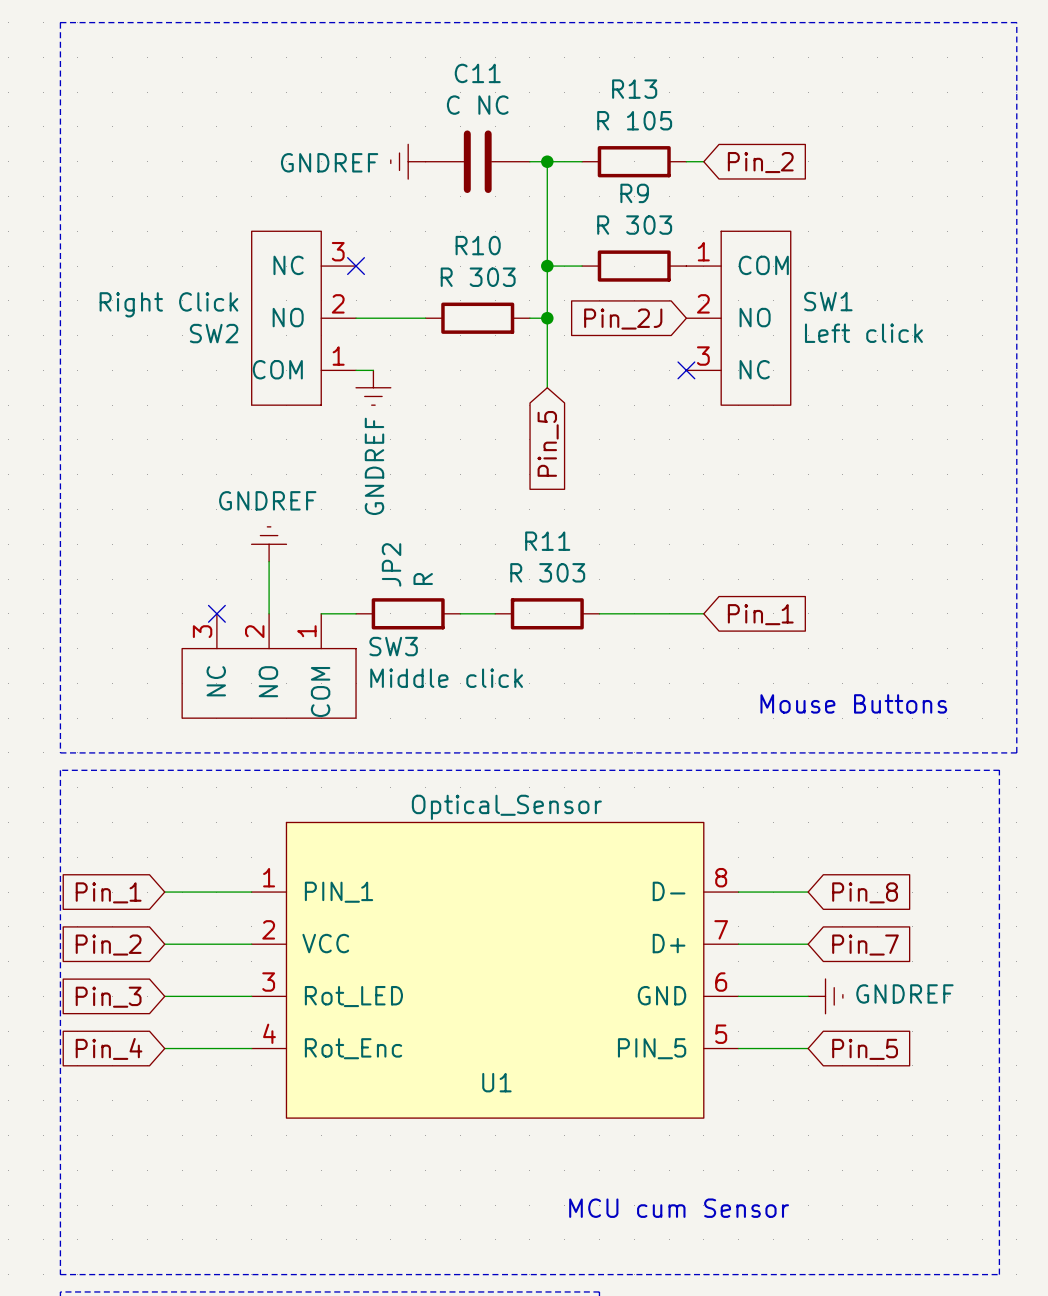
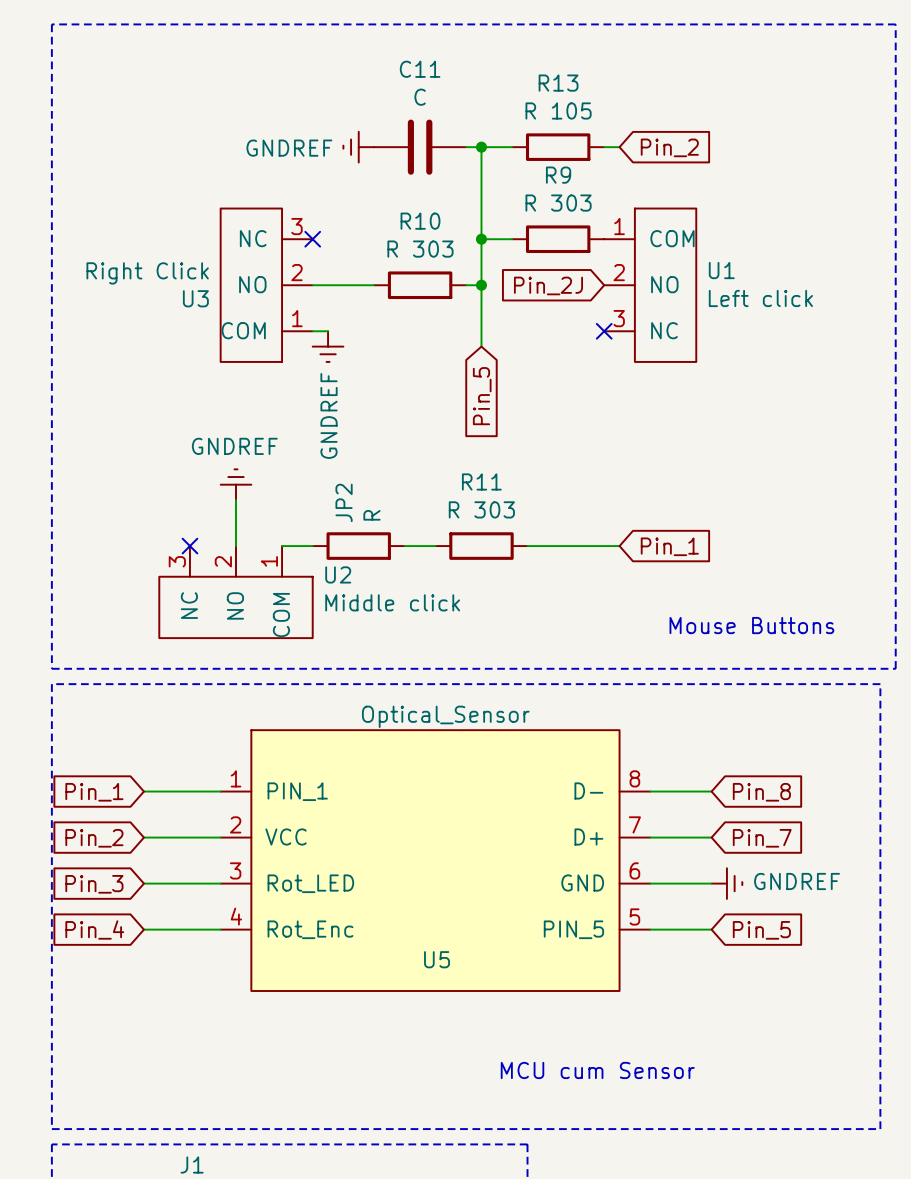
C11 value: C NC (477, 105) -> C (420, 97)
SW1 name: SW1 (828, 301) -> U1 (721, 270)
SW2 name: SW2 (214, 333) -> U3 (195, 298)
SW3 name: SW3 (393, 646) -> U2 (338, 574)
U1 name: U1 (496, 1082) -> U5 (437, 959)

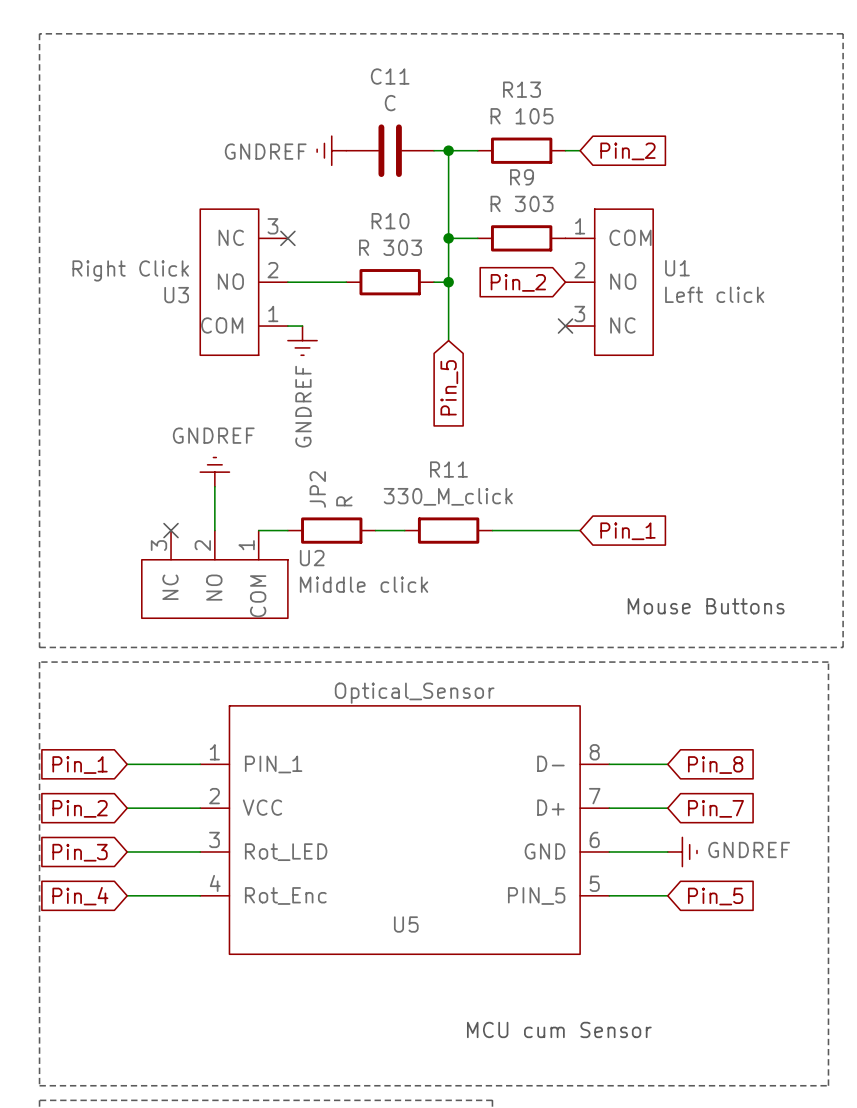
global label: Pin_2J (548, 285) -> Pin_2 (518, 282)
R11 value: R 303 (481, 509) -> 330_M_click (448, 496)

